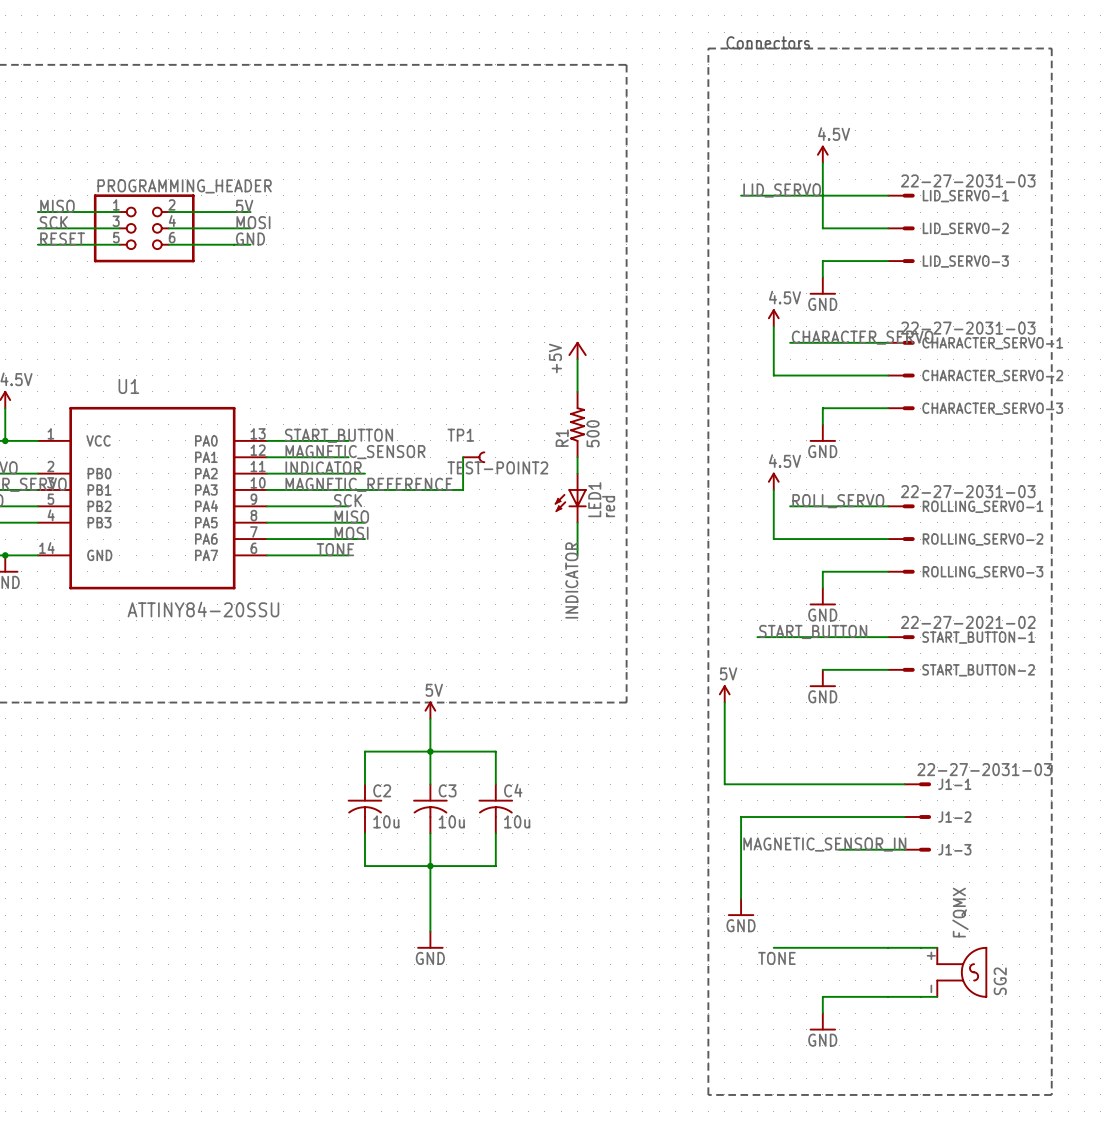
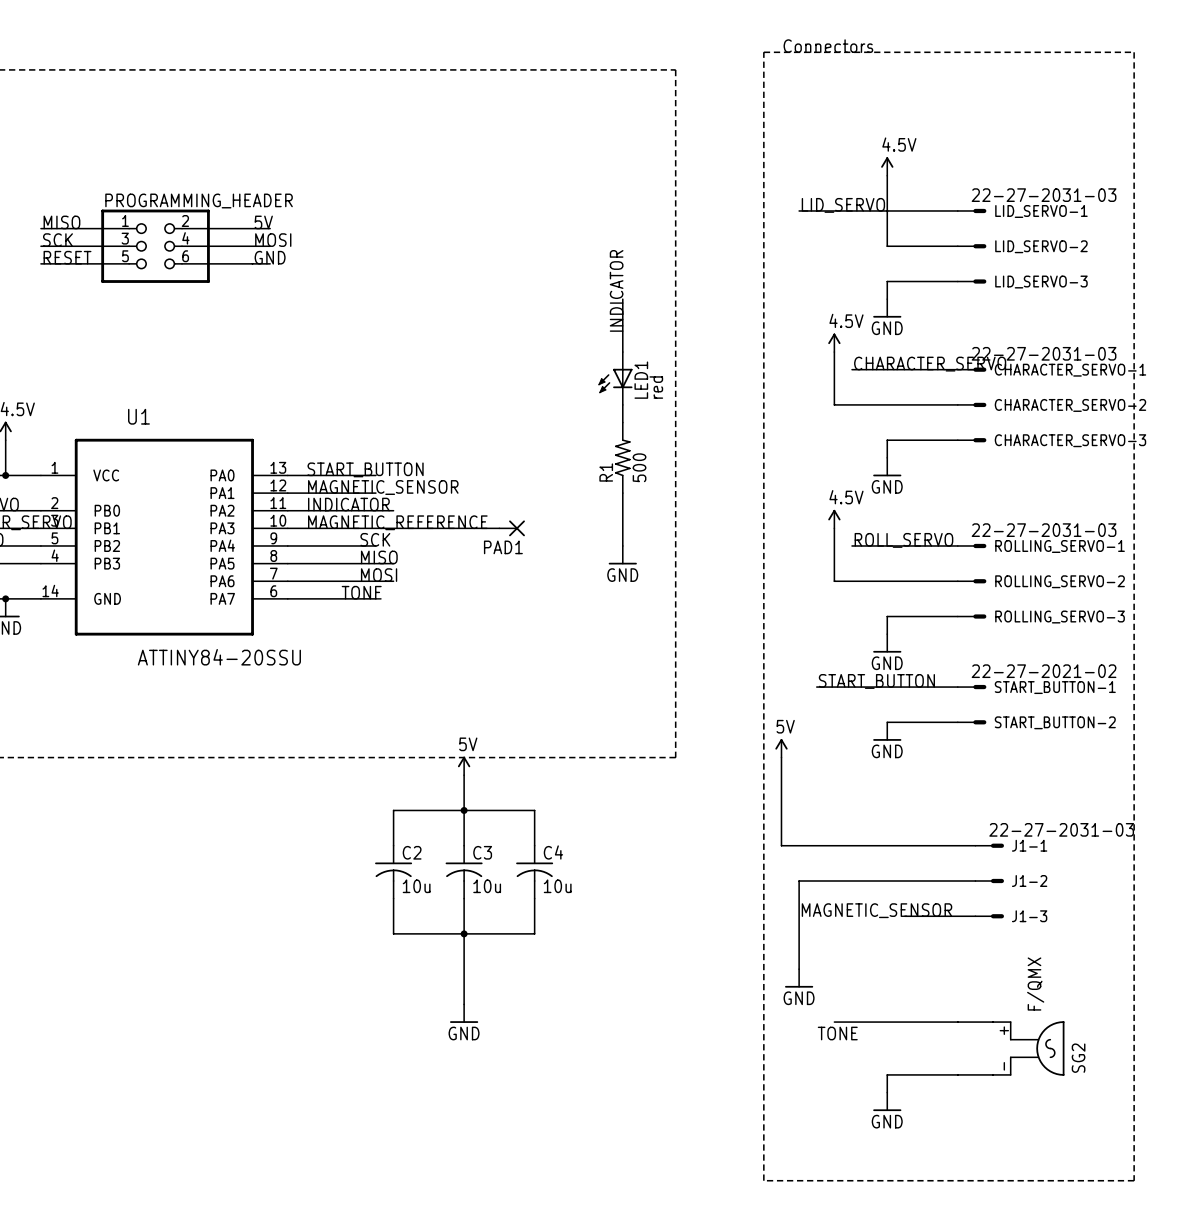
label: none -> INDICATOR (616, 290)
wire: none -> (622, 299) (622, 352)
power symbol: +5V (577, 350) -> none
wire: (463, 457) (463, 489) -> none
TP1: TEST-POINT2 (473, 457) -> none
PAD1: none -> (512, 528)
LED1 position: (570, 498) -> (615, 378)
power symbol: none -> GND (622, 555)
label: INDICATOR (571, 580) -> none
label: MAGNETIC_SENSOR_IN (824, 844) -> MAGNETIC_SENSOR (876, 910)

